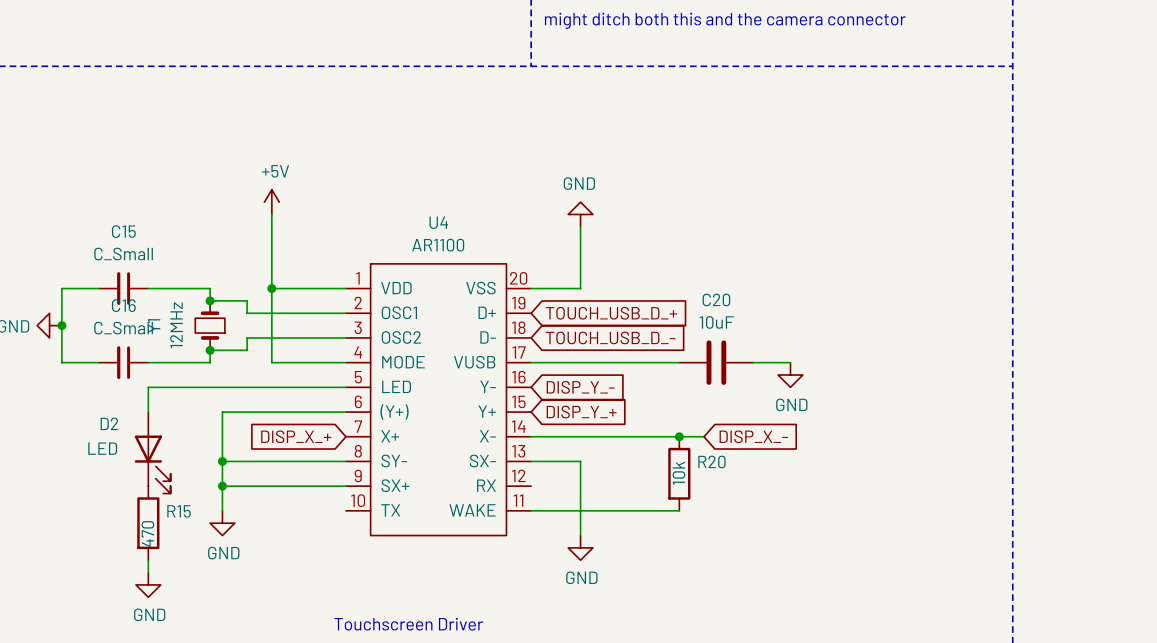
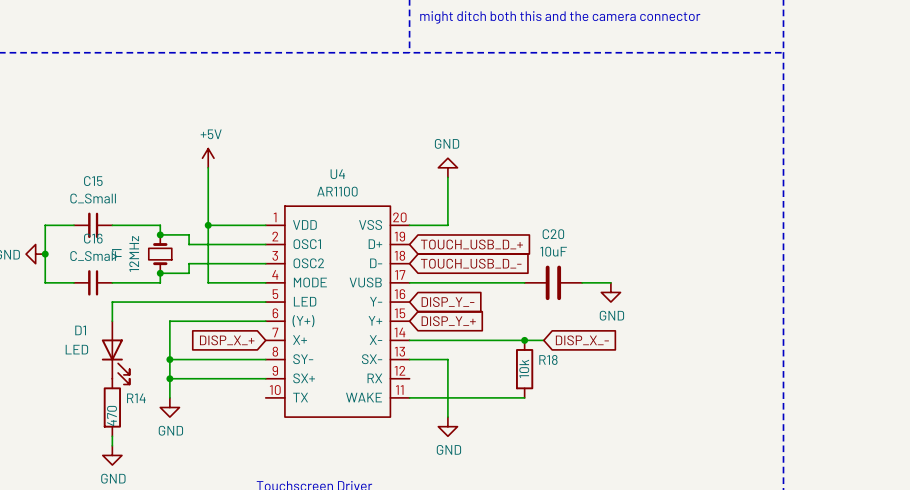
D2 name: D2 (109, 423) -> D1 (80, 330)
R20 name: R20 (711, 461) -> R18 (548, 359)
R15 name: R15 (179, 511) -> R14 (136, 398)

